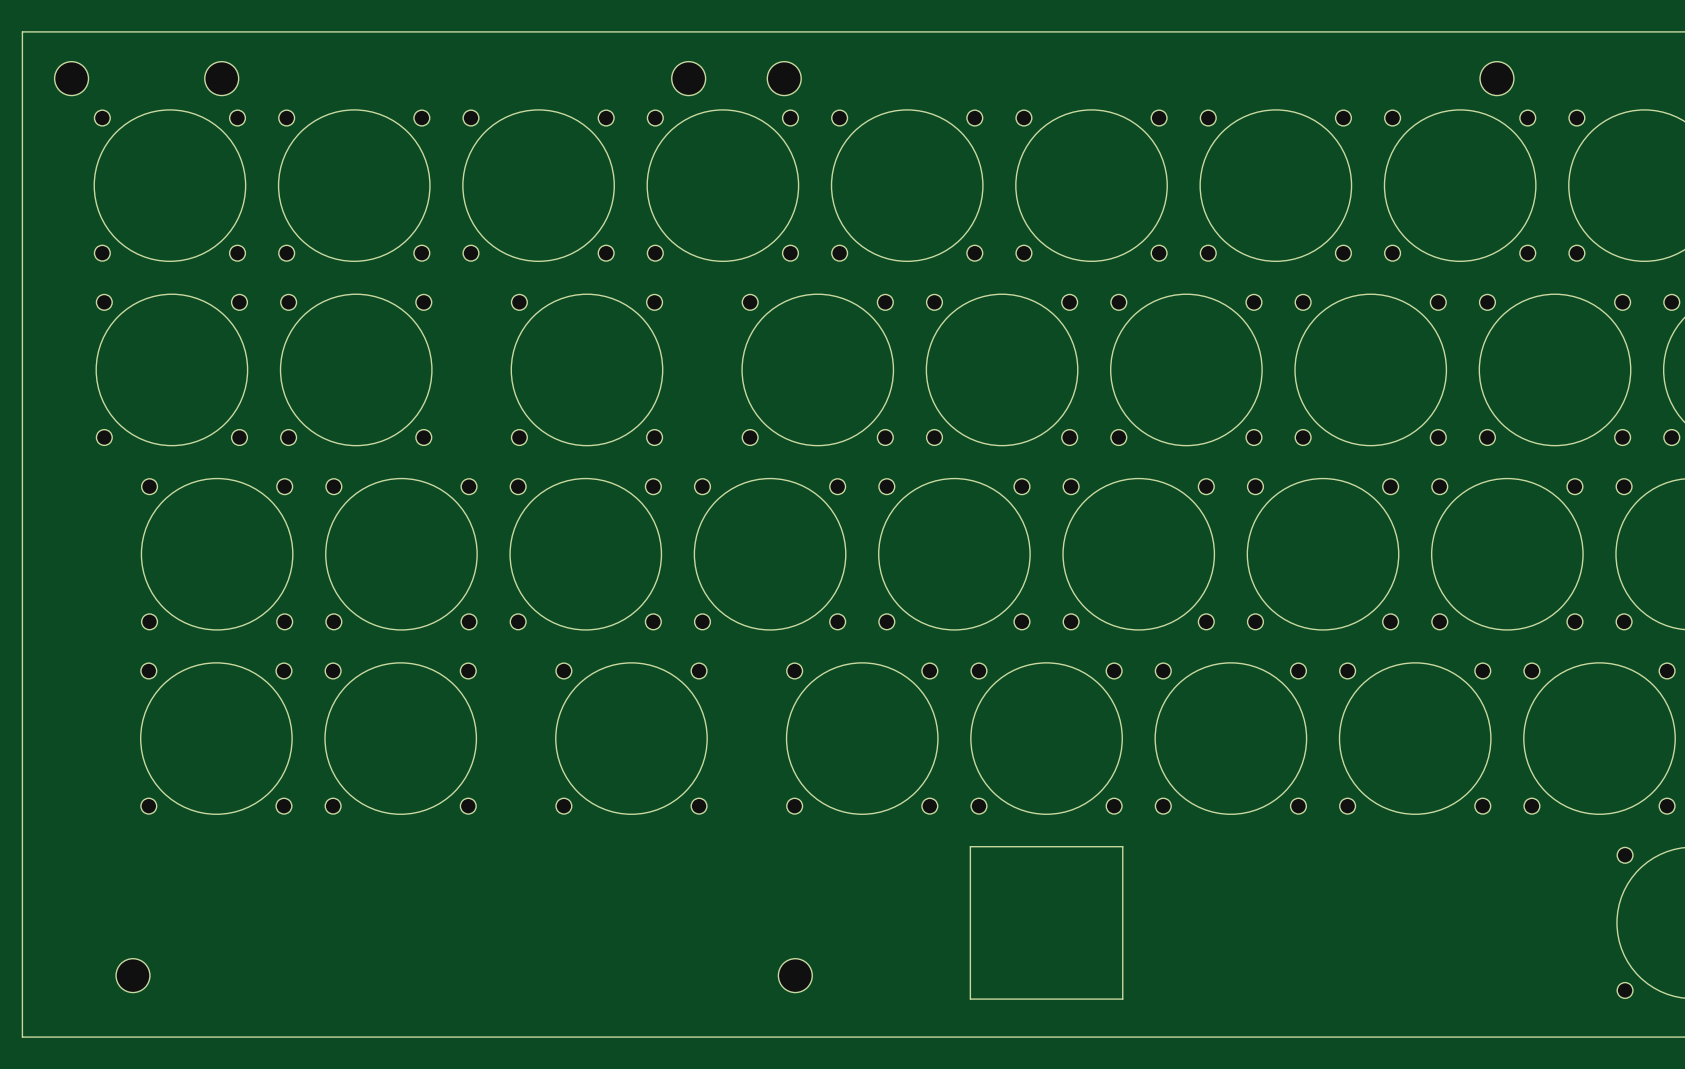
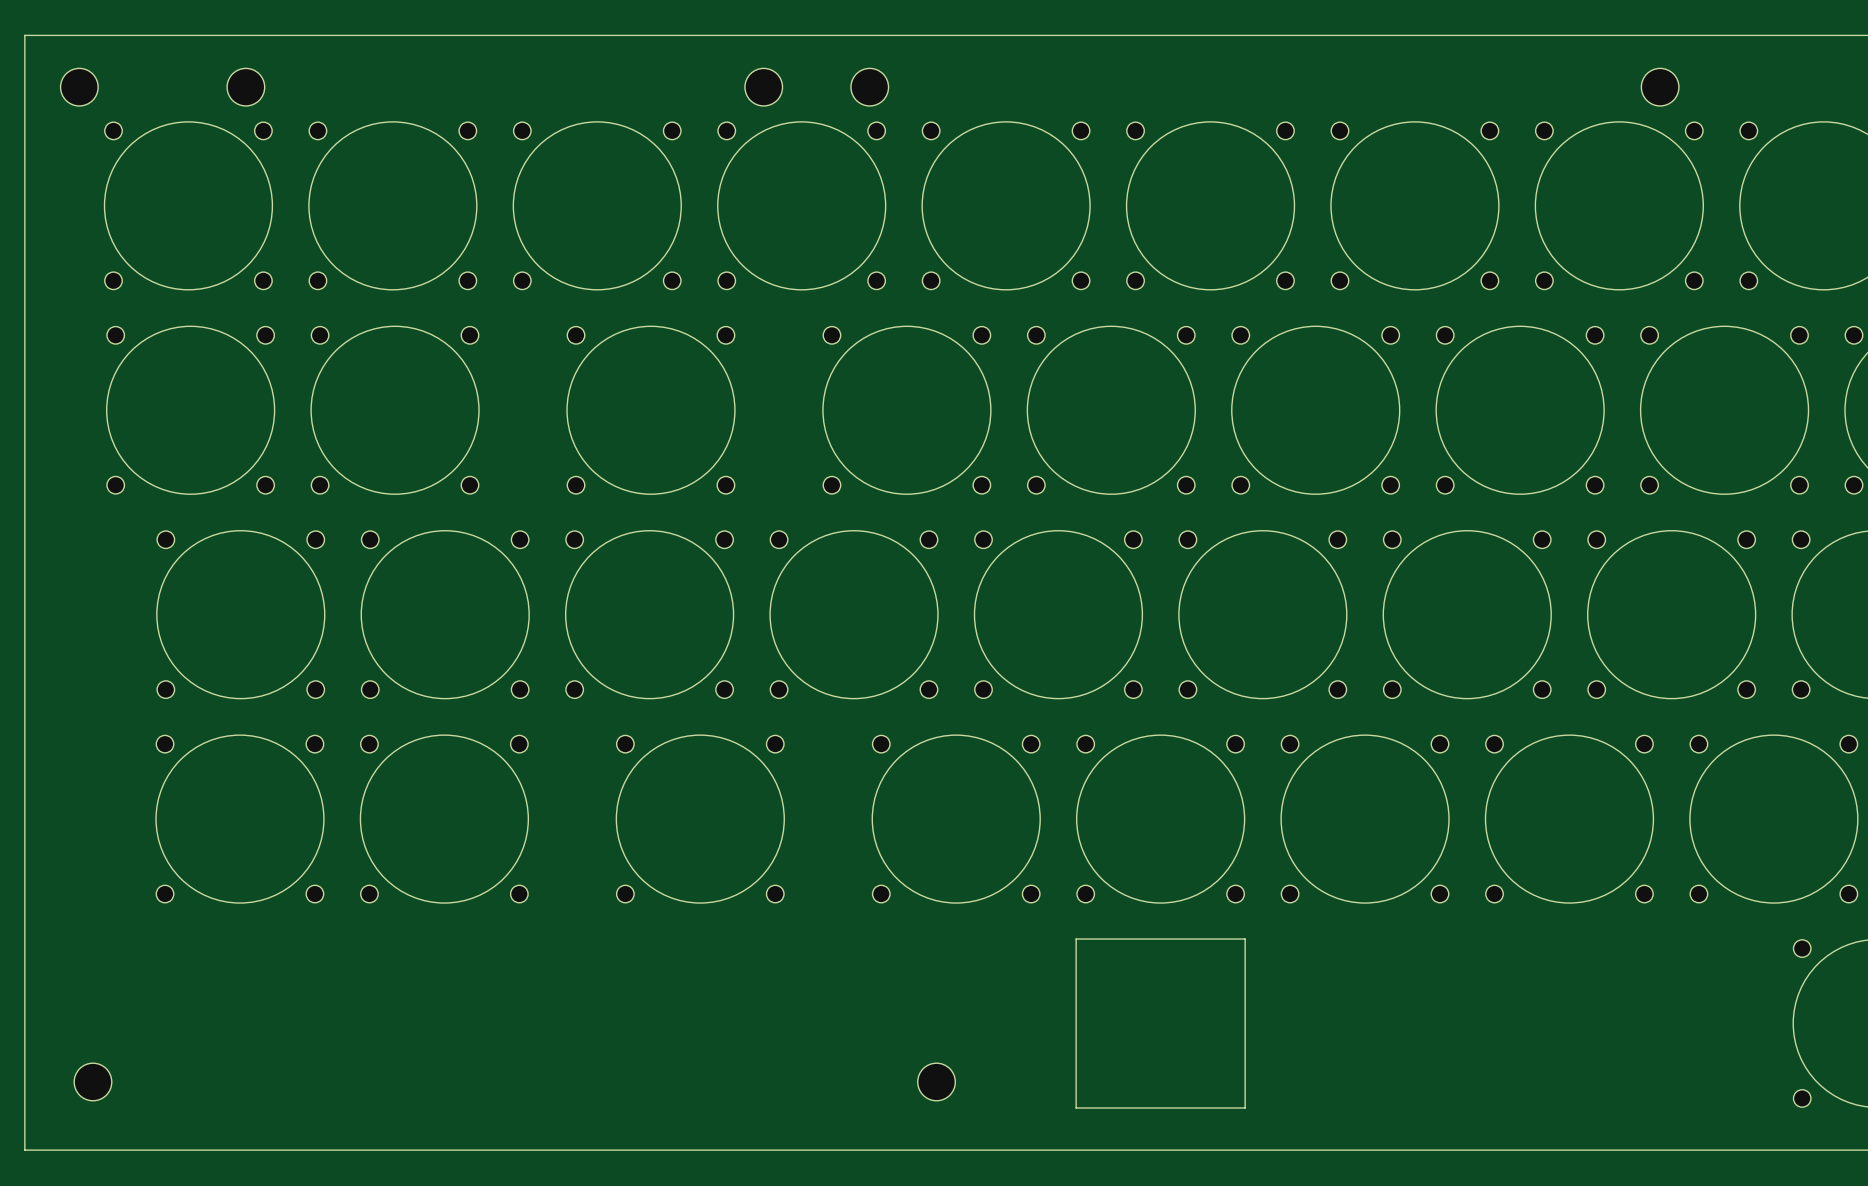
part position: (133, 975) -> (92, 1081)
part position: (795, 975) -> (936, 1081)

